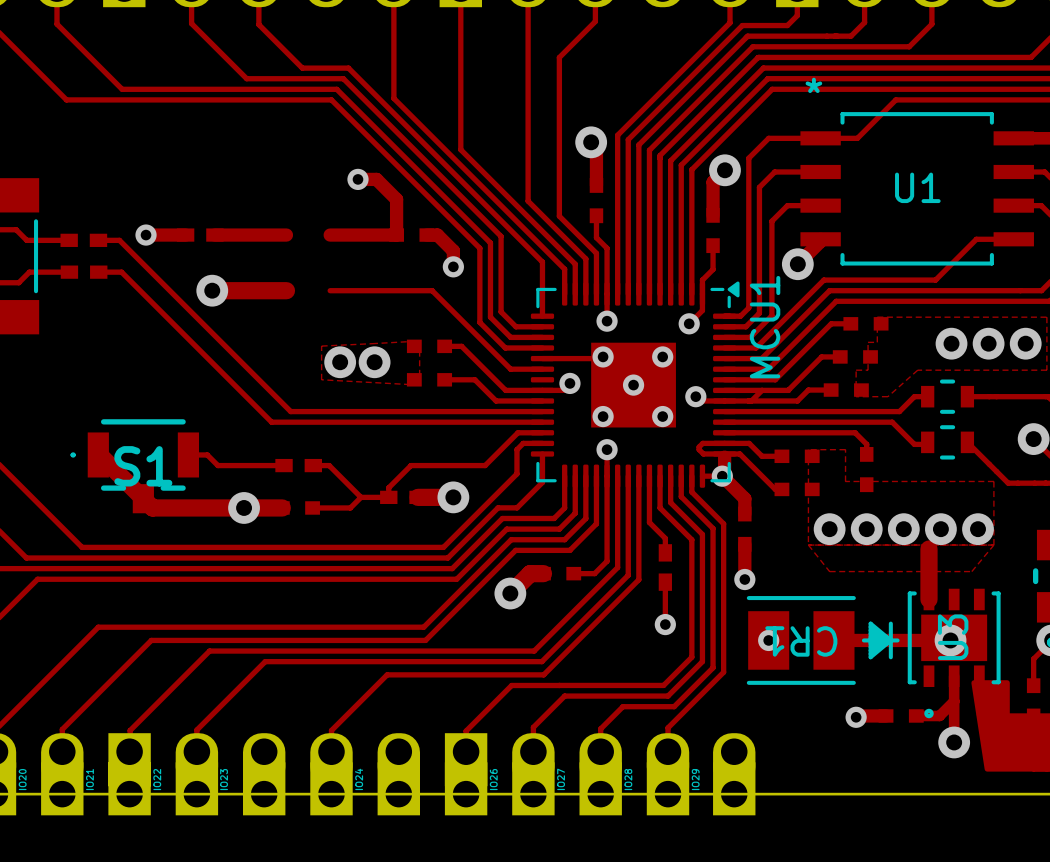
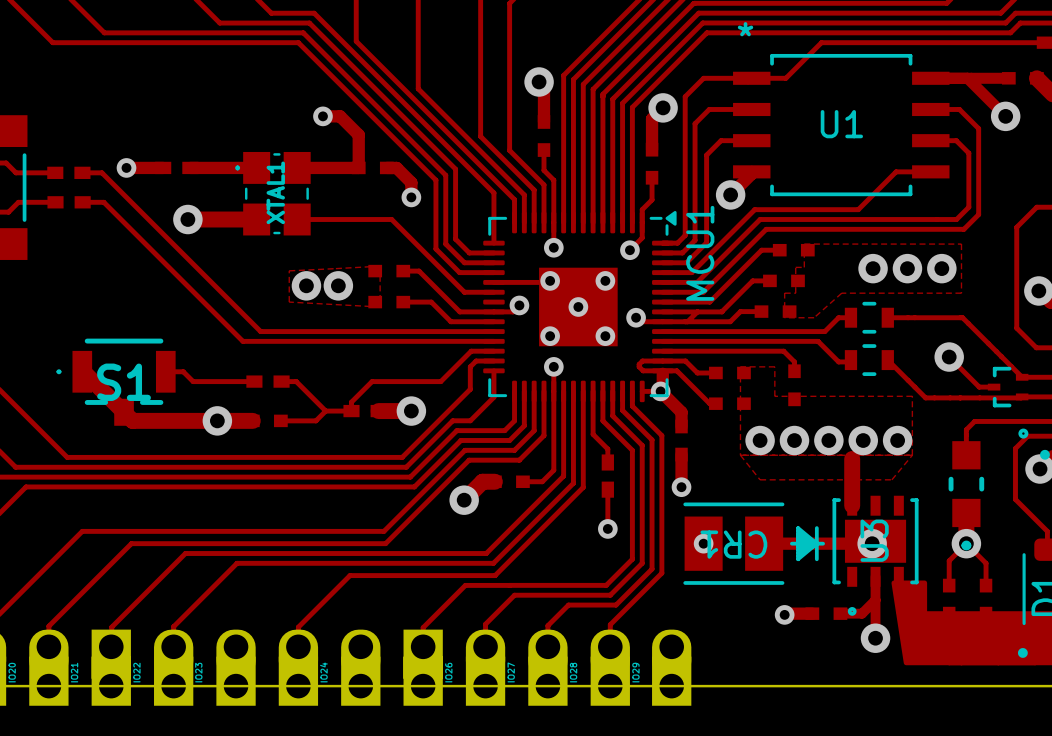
XTAL1: none -> (272, 193)

